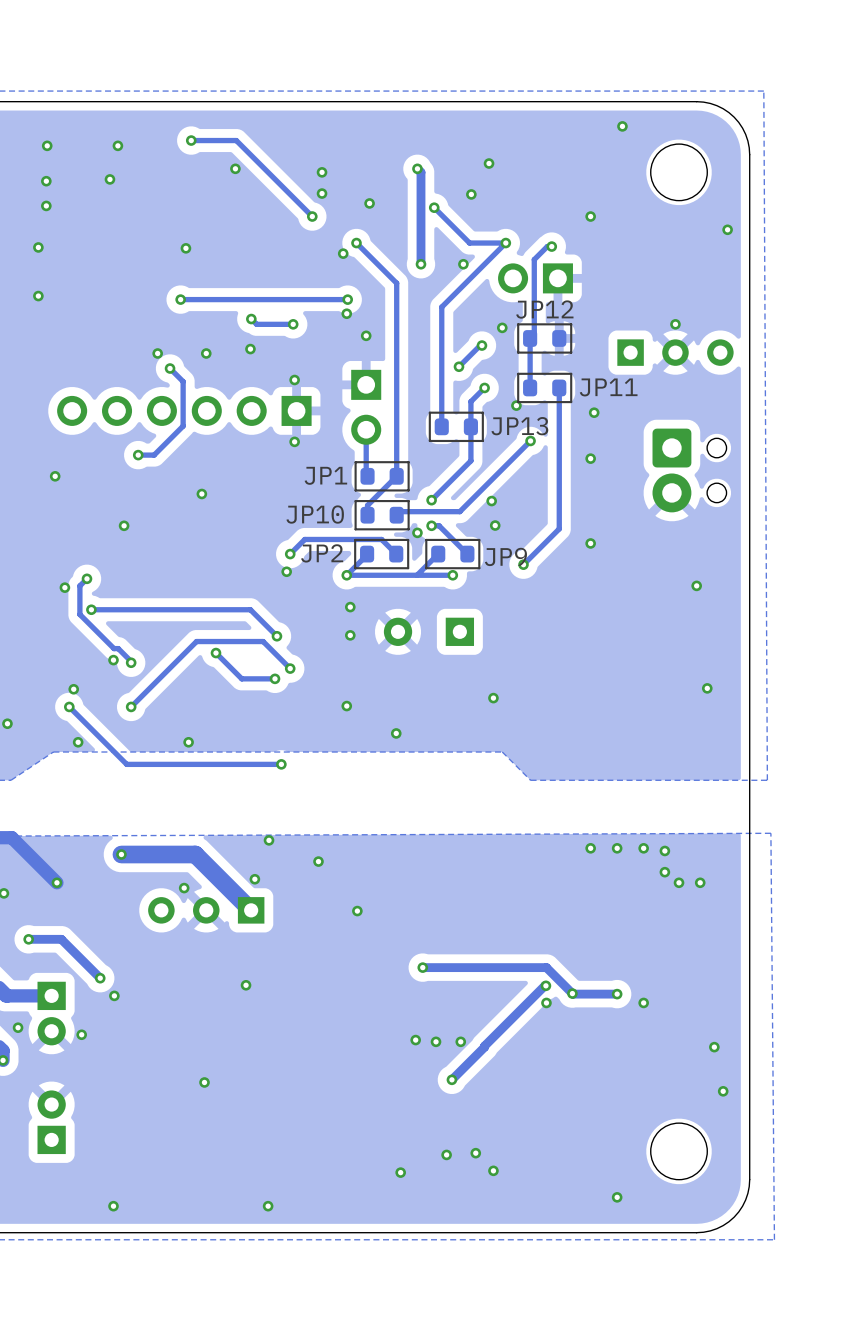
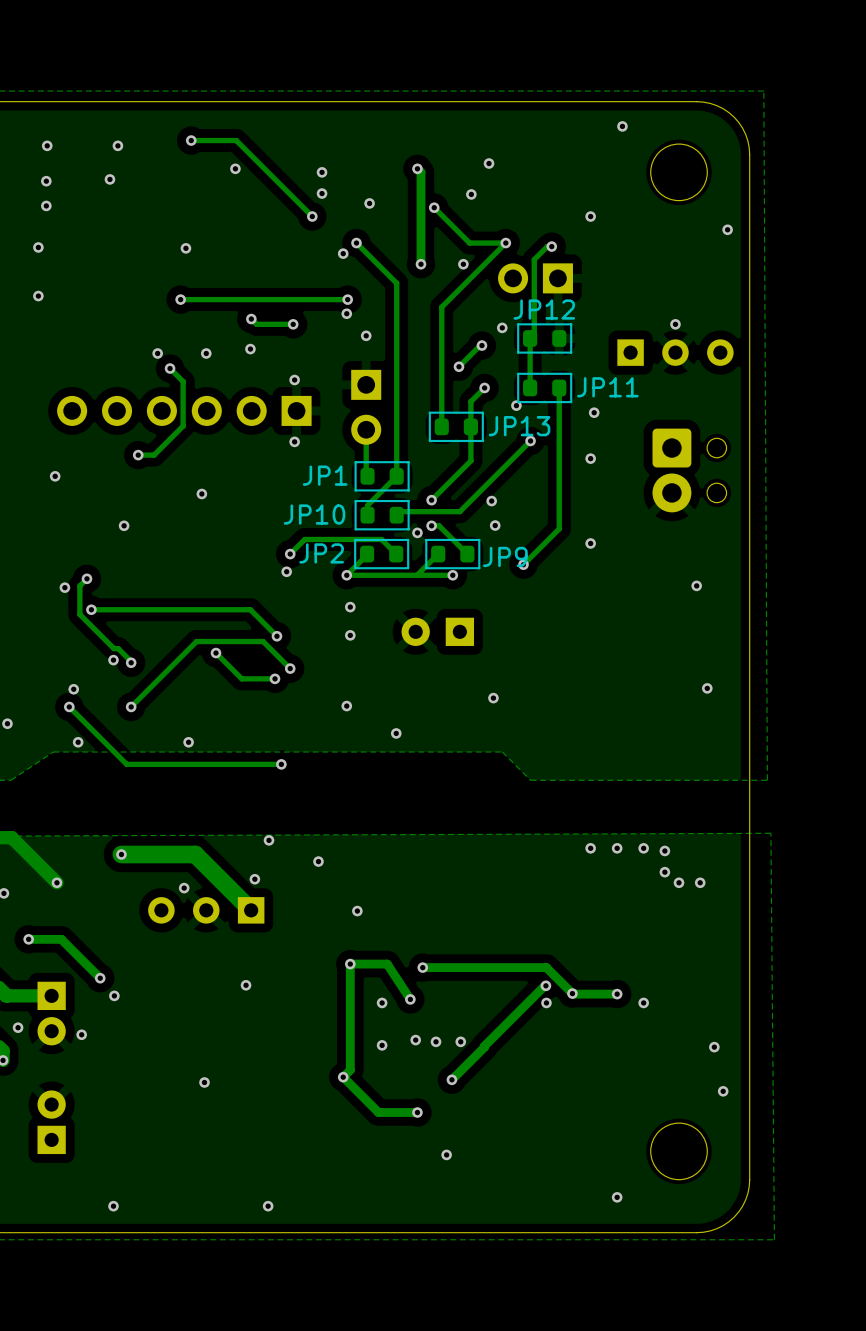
part footprint: [383, 617, 475, 646] -> [401, 617, 475, 646]
via: none -> (350, 964)
track: none -> (410, 999) (387, 964) (350, 964) (350, 1070) (343, 1077) (378, 1112) (417, 1112)
via: none -> (410, 999)
via: none -> (382, 1002)
via: none -> (382, 1045)
via: none -> (343, 1077)
via: none -> (417, 1112)
via: (475, 1153) -> none
via: (493, 1170) -> none
via: (400, 1172) -> none

